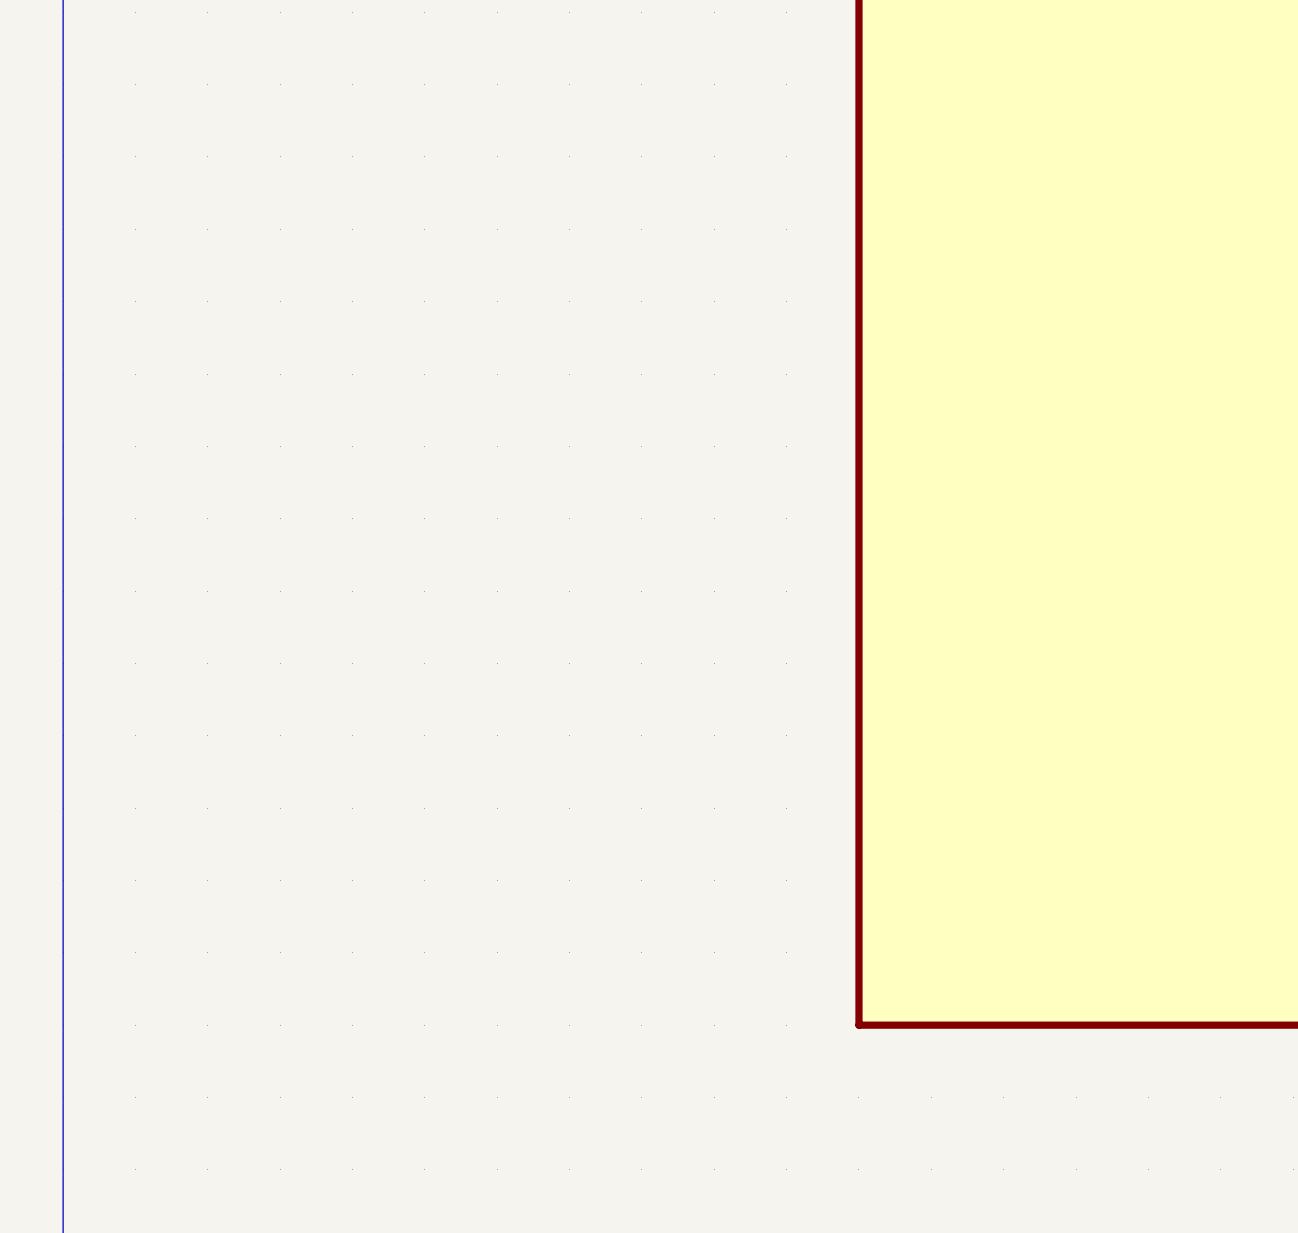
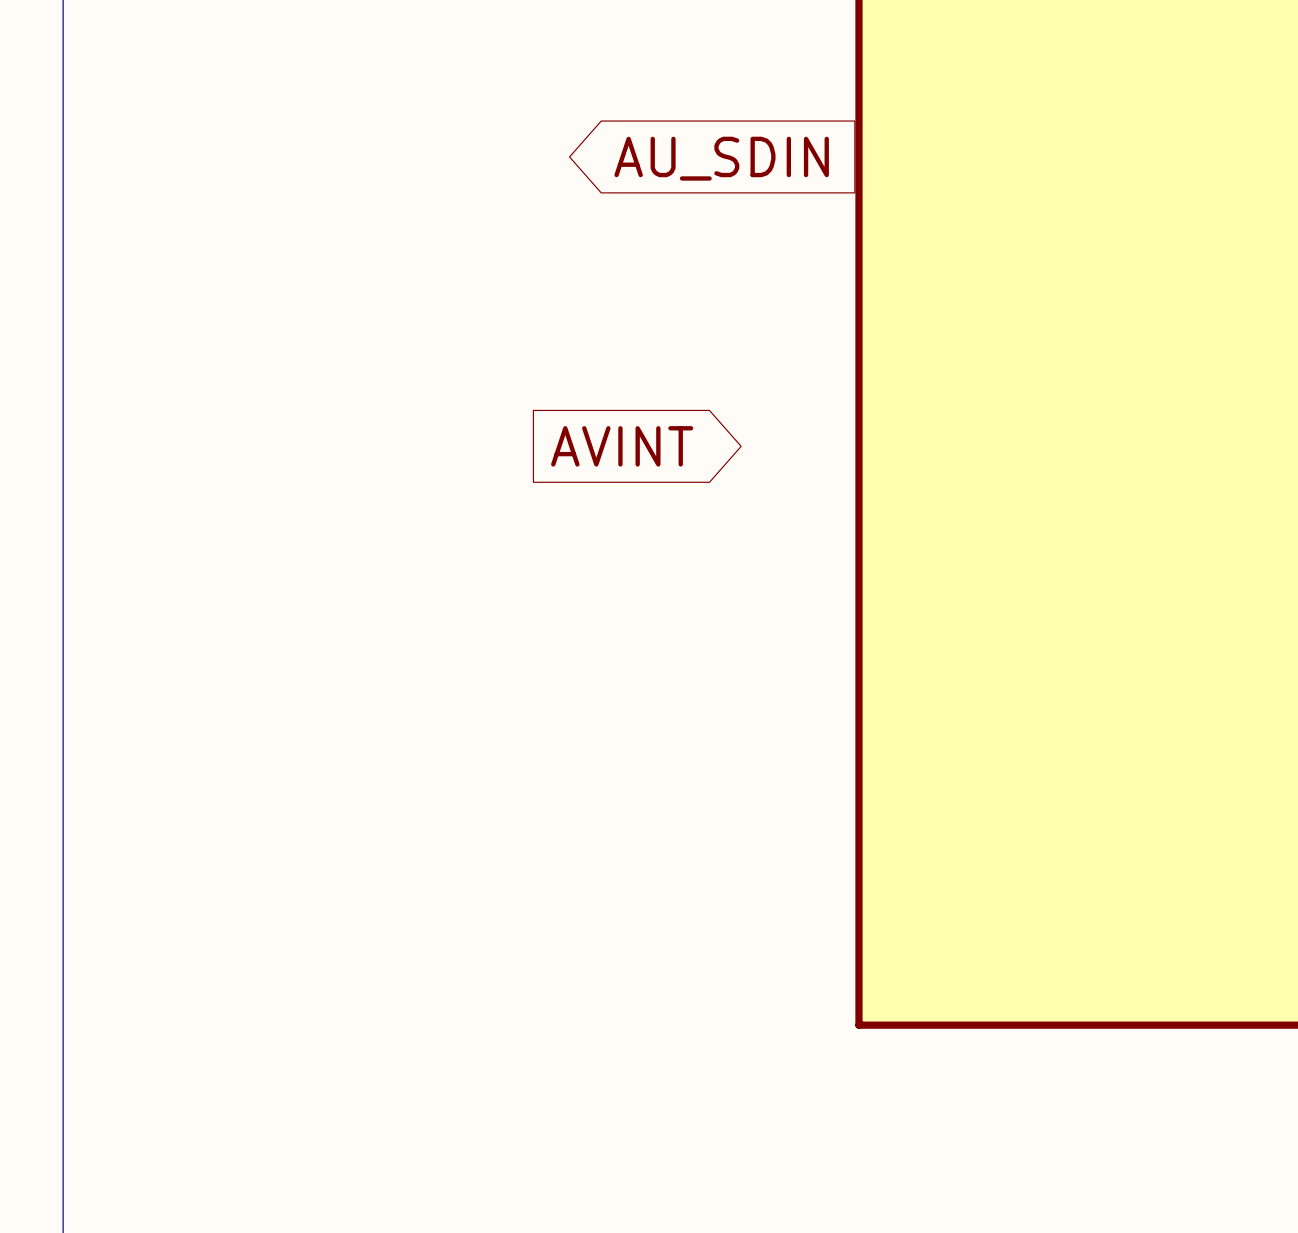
global label: none -> AU_SDIN (721, 158)
global label: none -> AVINT (622, 446)

